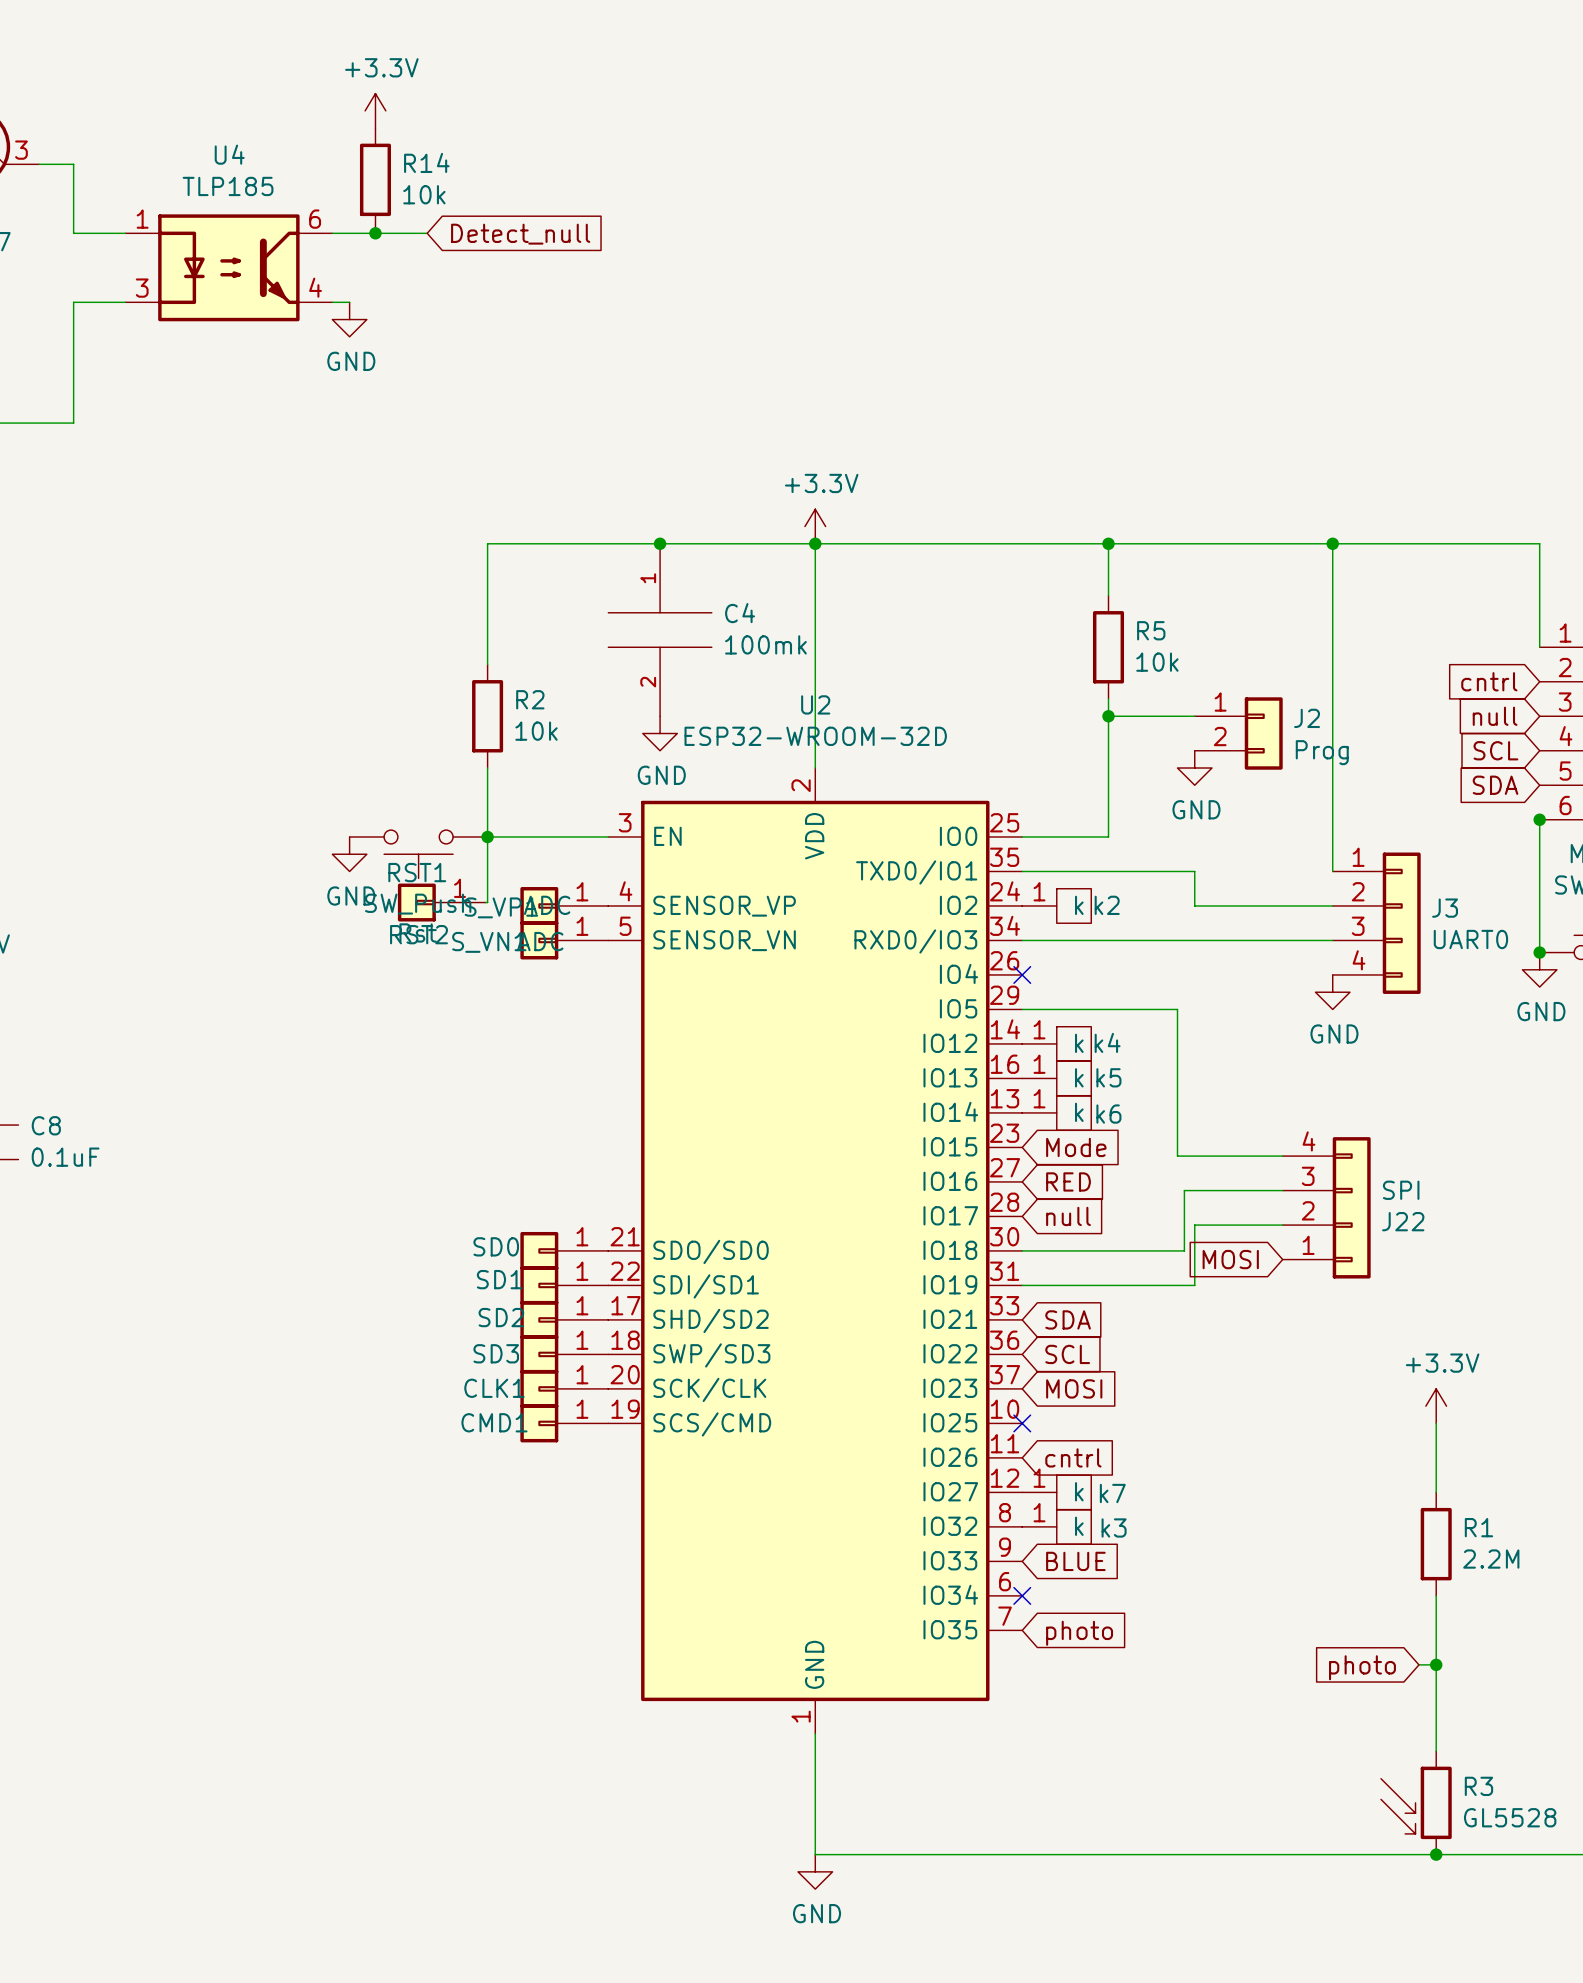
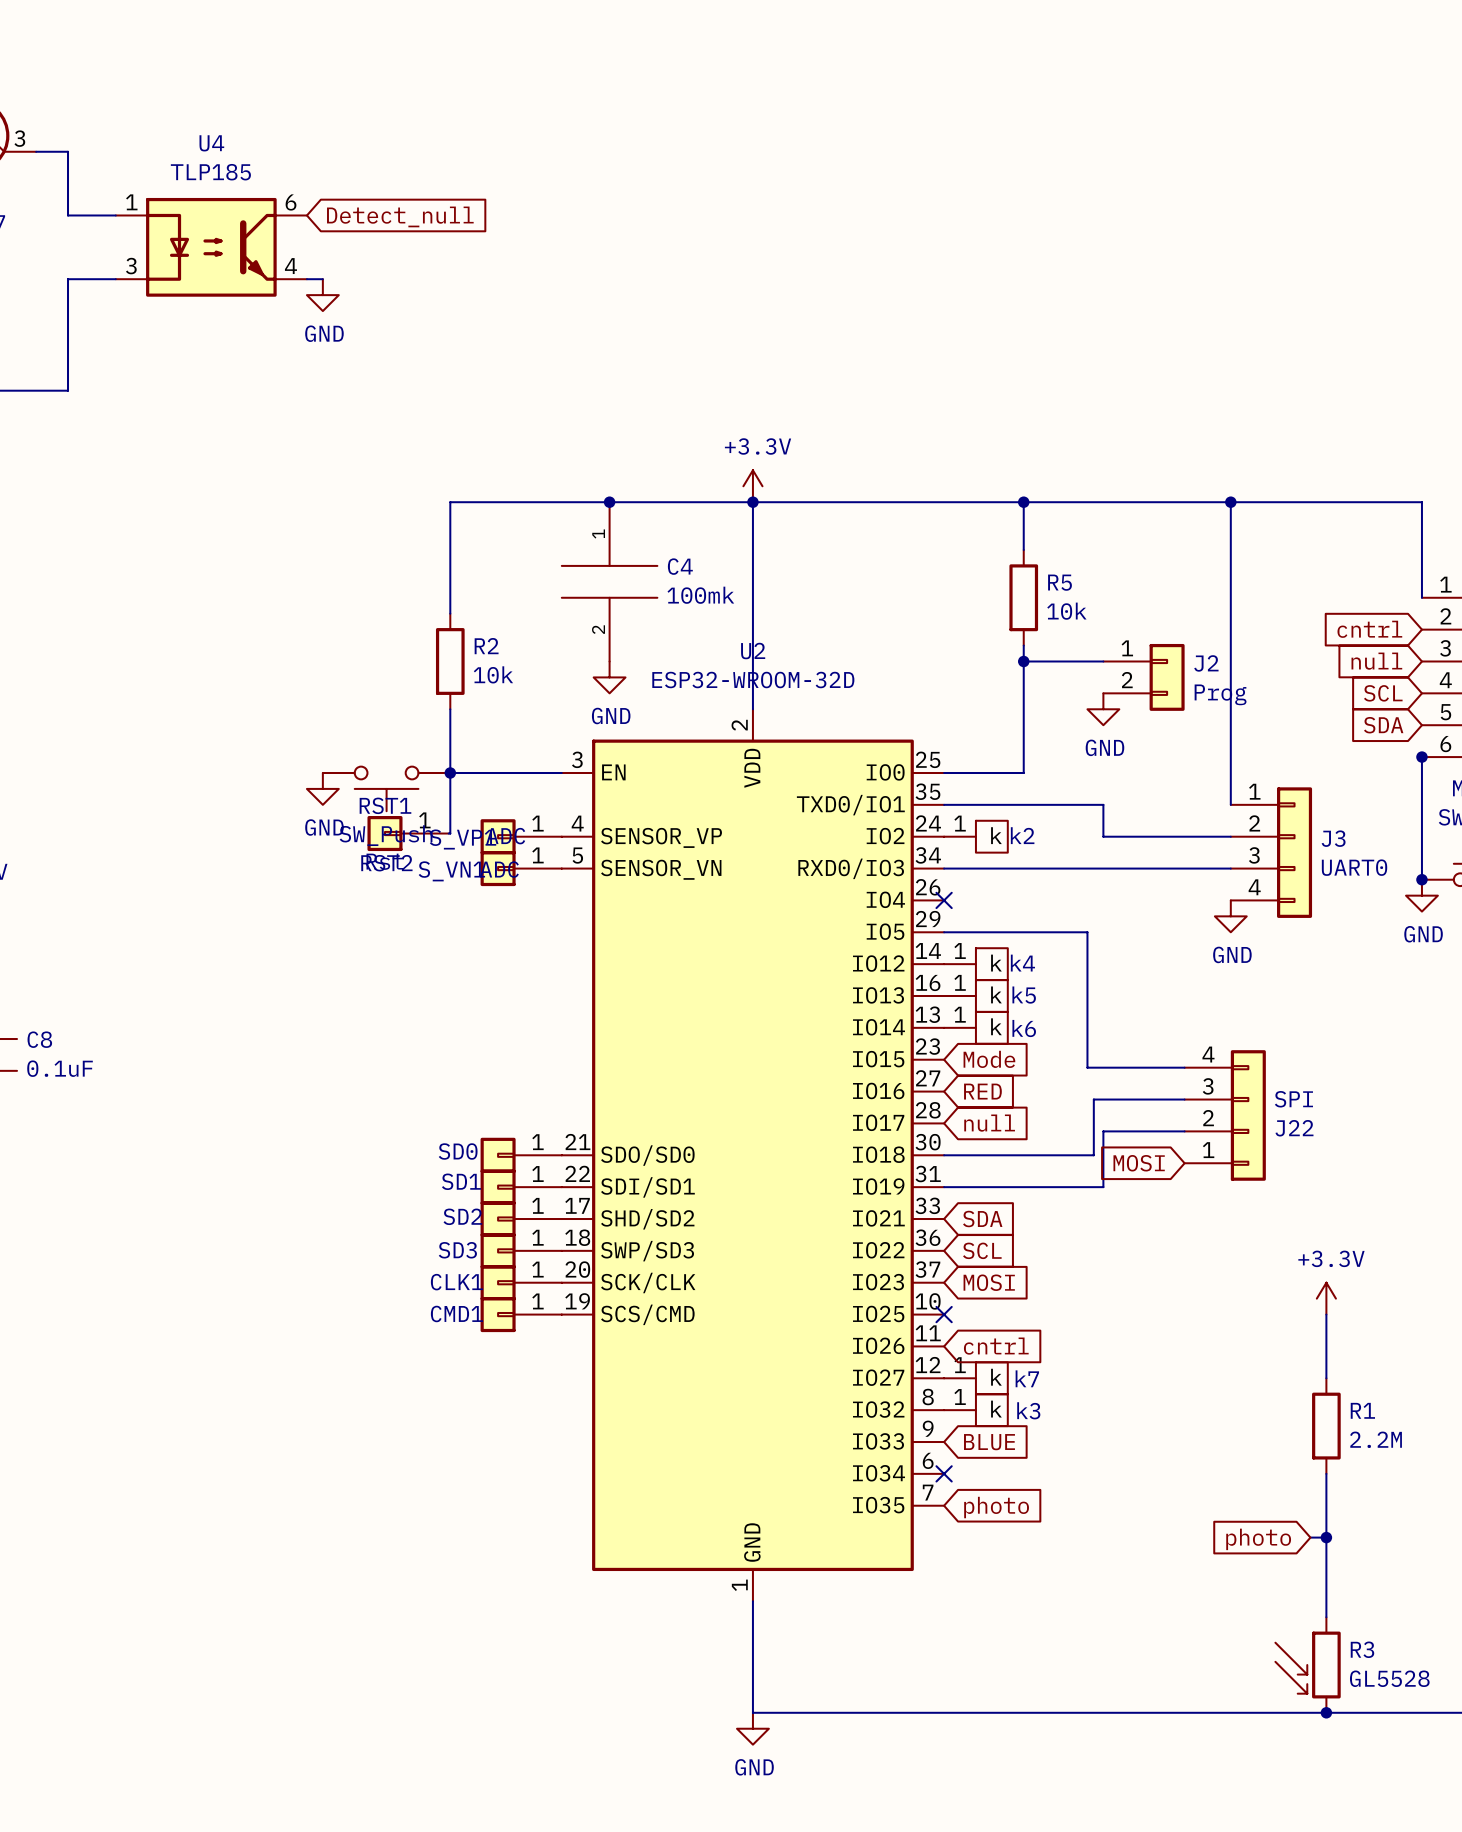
power symbol: +3.3V (375, 110) -> none
R14: 10k (375, 179) -> none
wire: (332, 233) (427, 233) -> none
junction: (375, 233) -> none
global label position: Detect_null (520, 234) -> Detect_null (400, 216)

